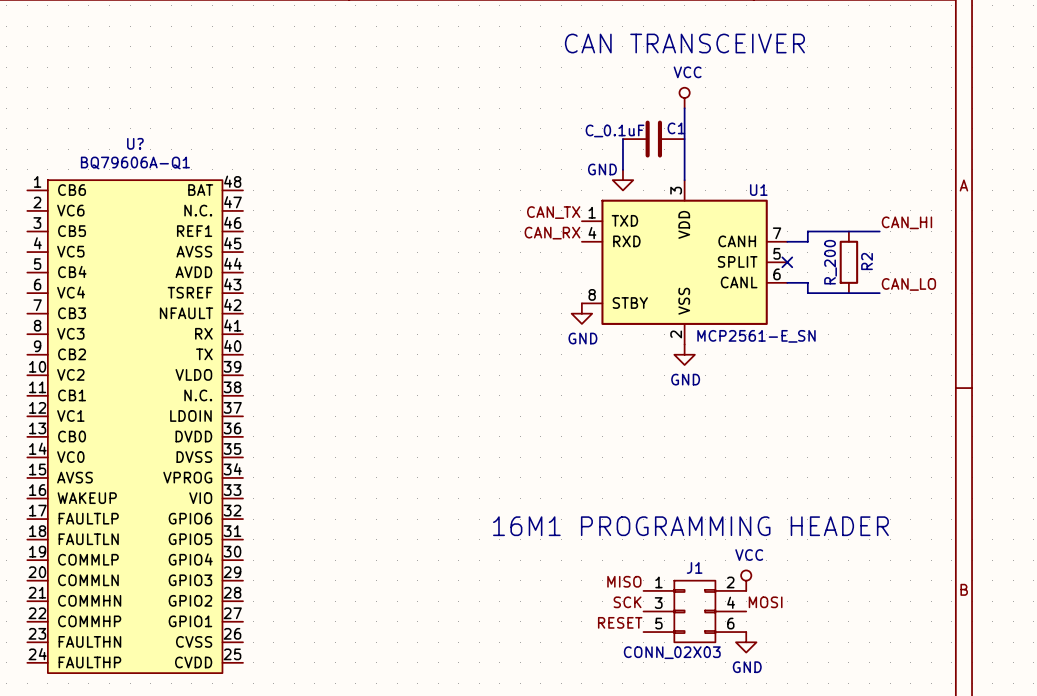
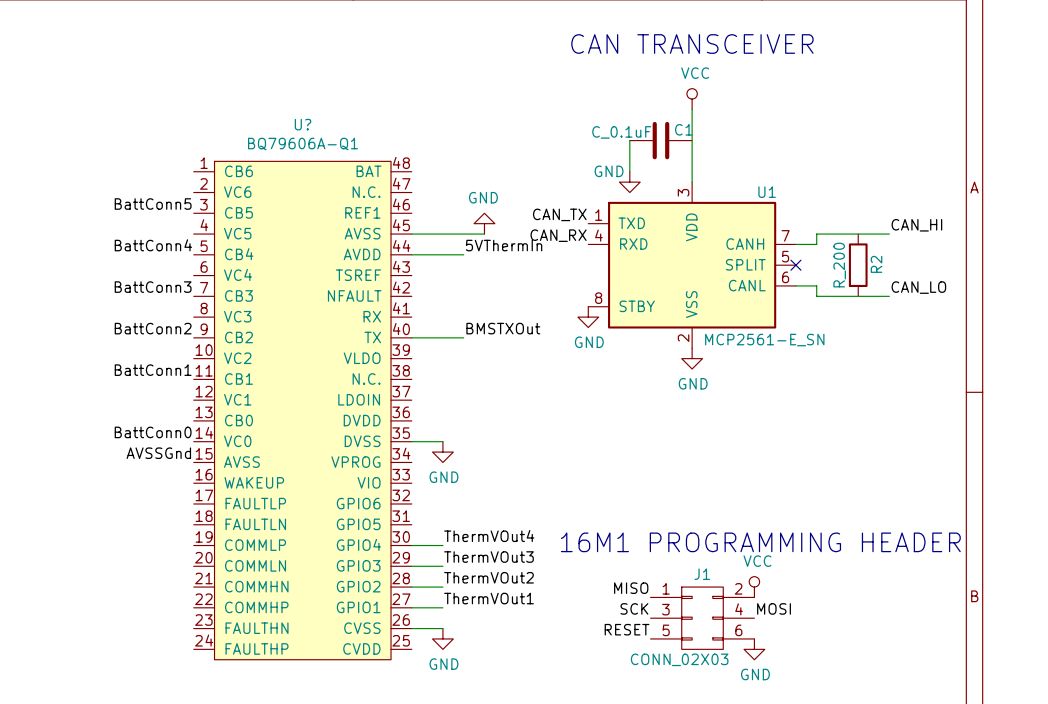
label: none -> BattConn5 (153, 204)
power symbol: none -> GND (484, 223)
wire: none -> (411, 234) (484, 234)
label: none -> BattConn4 (153, 245)
label: none -> 5VThermIn (504, 245)
wire: none -> (411, 254) (463, 254)
label: none -> BattConn3 (153, 287)
label: none -> BattConn2 (153, 328)
label: none -> BMSTXOut (503, 328)
wire: none -> (411, 337) (463, 337)
label: none -> BattConn1 (153, 370)
U? position: (135, 426) -> (302, 410)
label: none -> BattConn0 (153, 432)
wire: none -> (411, 441) (442, 441)
power symbol: none -> GND (442, 452)
label: none -> AVSSGnd (158, 453)
text position: 16M1 PROGRAMMING HEADER (690, 526) -> 16M1 PROGRAMMING HEADER (760, 542)
label: none -> ThermVOut4 (489, 536)
wire: none -> (411, 545) (442, 545)
label: none -> ThermVOut3 (488, 557)
wire: none -> (411, 566) (442, 566)
label: none -> ThermVOut2 (488, 577)
wire: none -> (411, 587) (442, 587)
label: none -> ThermVOut1 (488, 598)
wire: none -> (411, 607) (442, 607)
wire: none -> (411, 628) (442, 628)
power symbol: none -> GND (442, 638)

